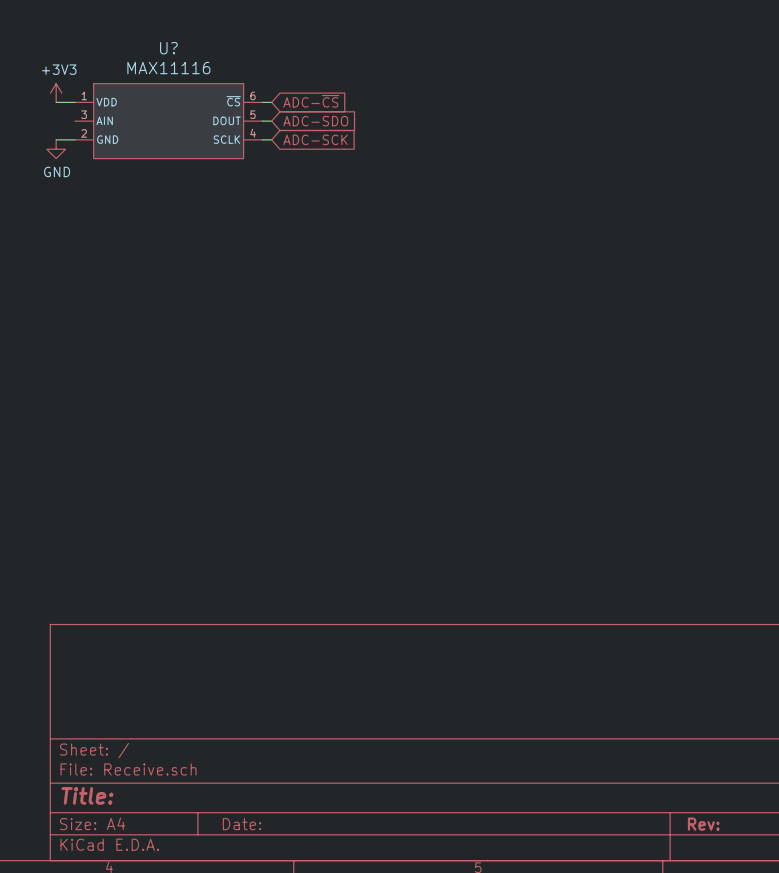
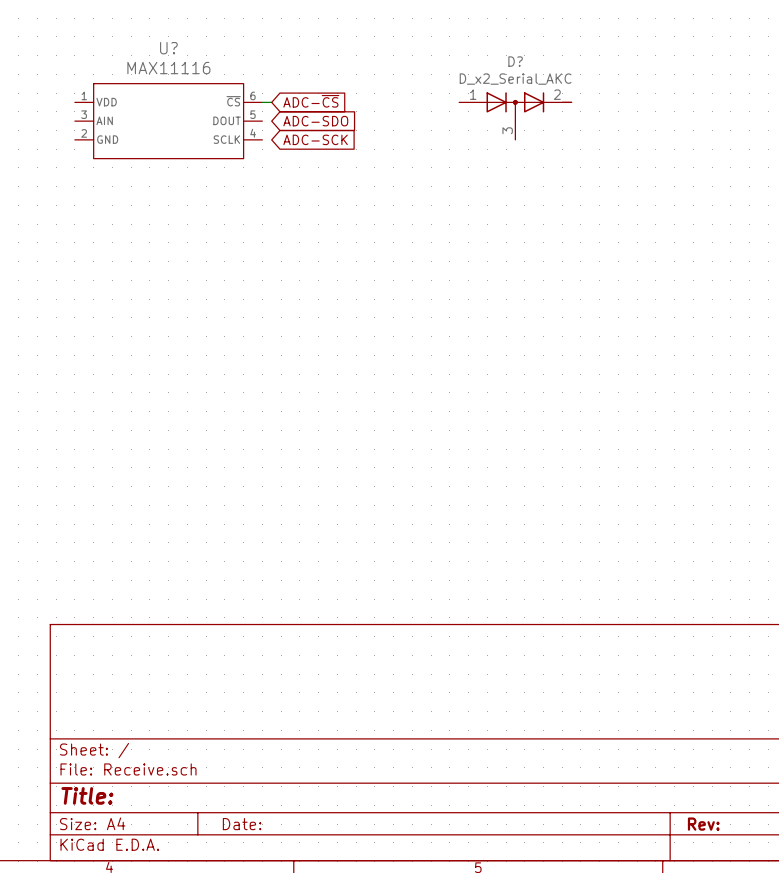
power symbol: +3V3 (56, 93) -> none
wire: (56, 102) (74, 102) -> none
D?: none -> D_x2_Serial_AKC (515, 116)
wire: (262, 121) (271, 121) -> none
wire: (56, 139) (74, 139) -> none
wire: (262, 139) (271, 139) -> none
power symbol: GND (56, 149) -> none

